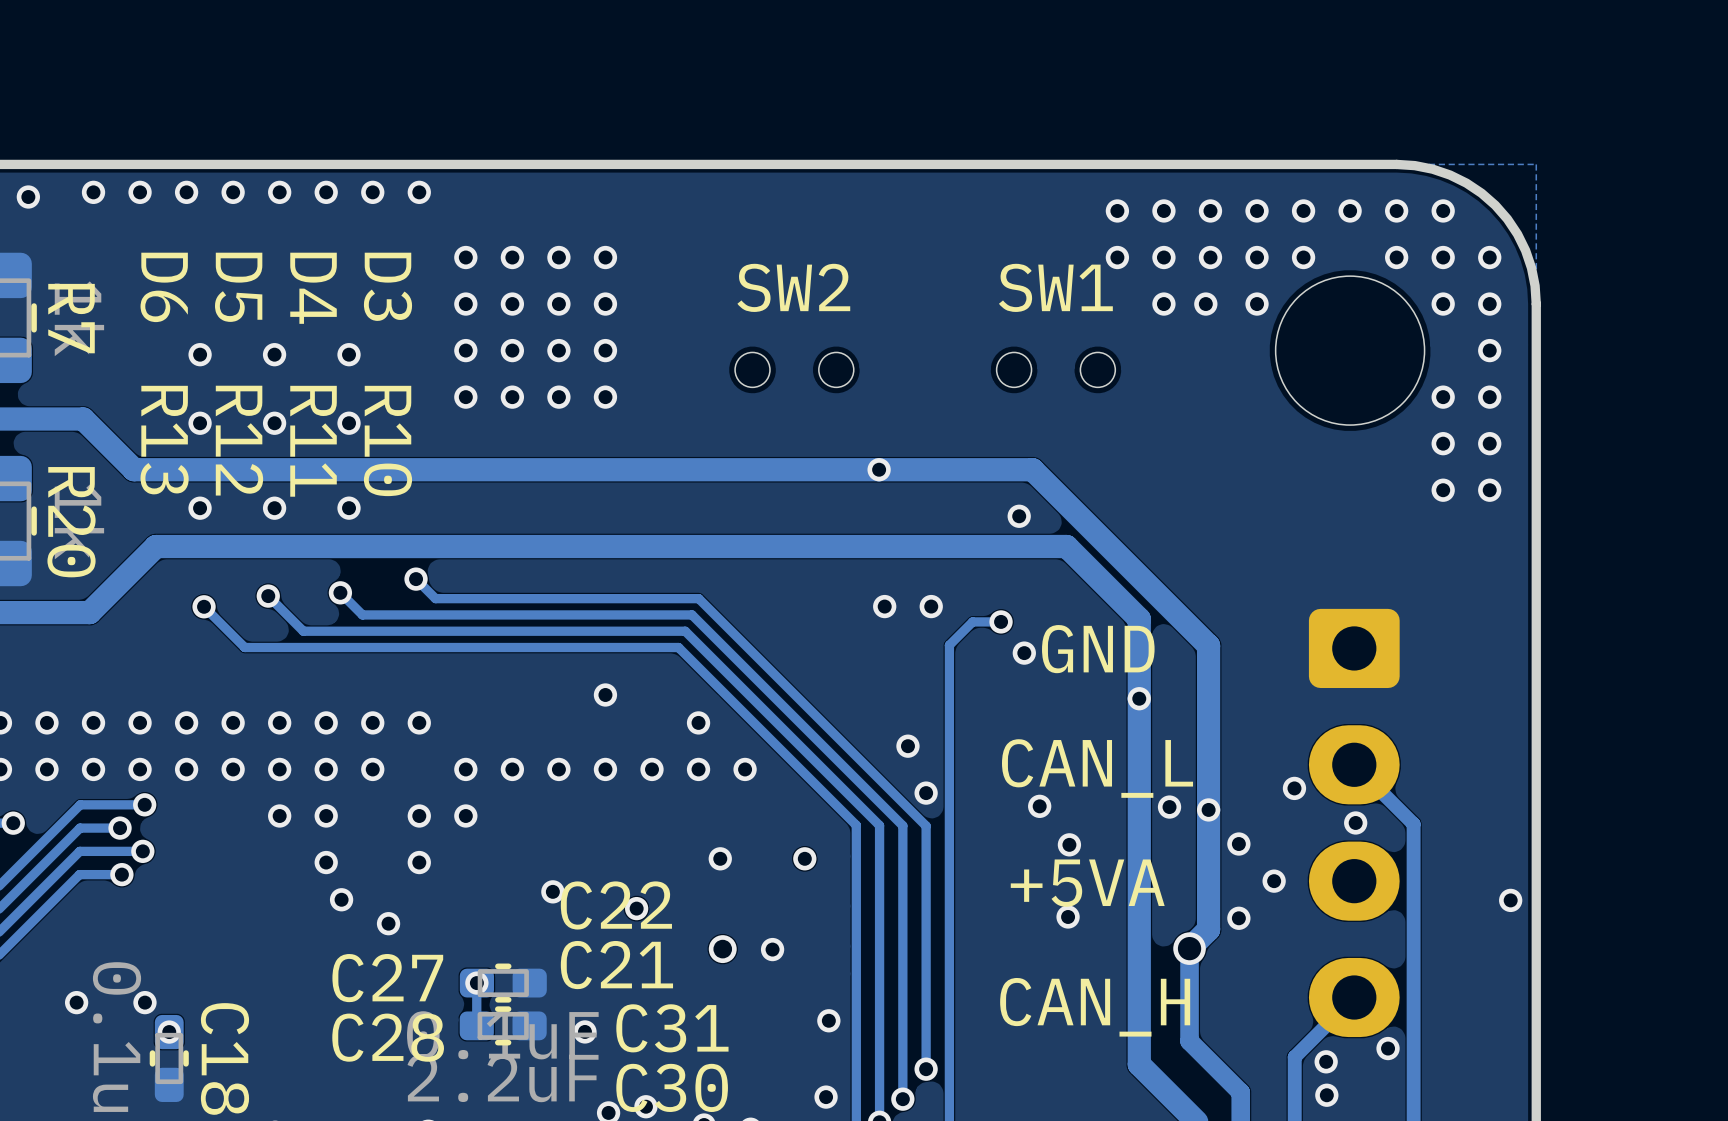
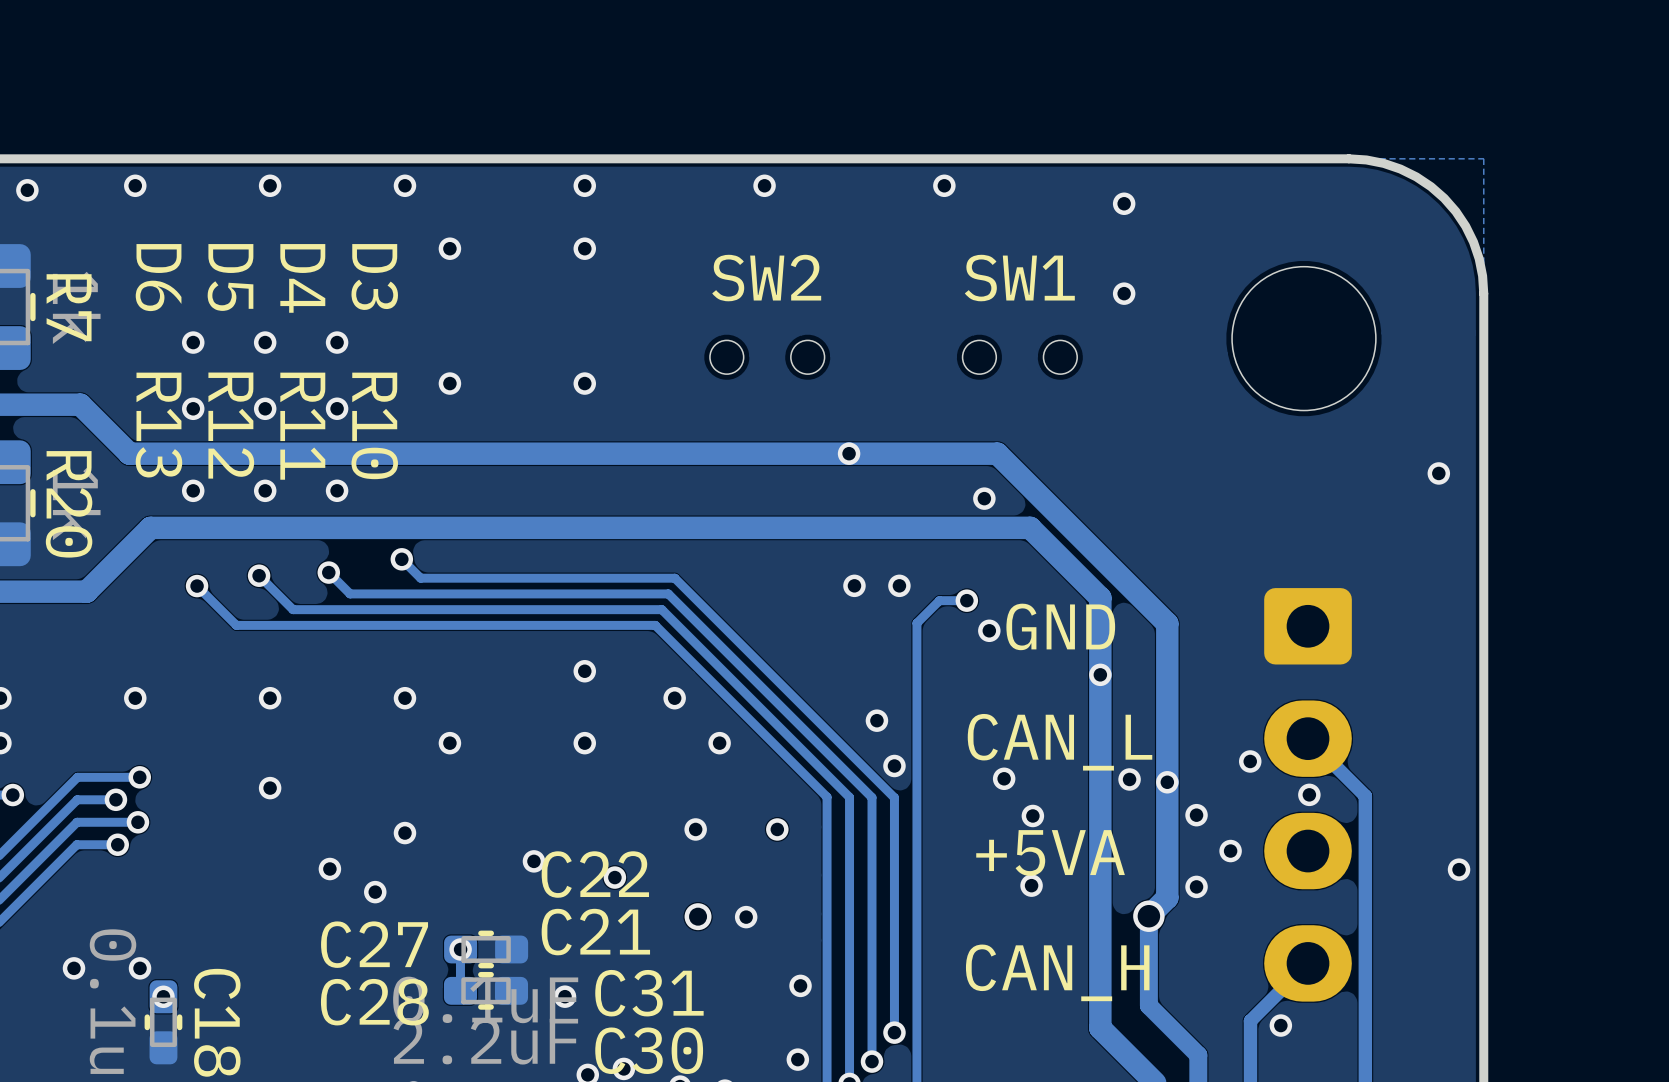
via: (93, 192) -> none
via: (186, 192) -> none
via: (233, 192) -> none
via: (326, 192) -> none
via: (372, 192) -> none
via: none -> (584, 185)
via: none -> (764, 185)
via: none -> (944, 185)
via: (1117, 210) -> none
via: (1210, 210) -> none
via: (1257, 210) -> none
via: (1303, 210) -> none
via: (1350, 210) -> none
via: (1396, 210) -> none
via: (1443, 210) -> none
via: (512, 257) -> none
via: (558, 257) -> none
via: (1117, 257) -> none
via: (1163, 257) -> none
via: (1210, 257) -> none
via: (1257, 257) -> none
via: (1303, 257) -> none
via: (1396, 257) -> none
via: (1443, 257) -> none
via: (1489, 257) -> none
via: (465, 304) -> none
via: (512, 304) -> none
via: (558, 304) -> none
via: (605, 304) -> none
via: (1205, 304) -> none
via: (1257, 304) -> none
via: (1443, 304) -> none
via: (1489, 304) -> none
via: (465, 350) -> none
via: (512, 350) -> none
via: (558, 350) -> none
via: (605, 350) -> none
via: (1489, 350) -> none
via: (512, 397) -> none
via: (558, 397) -> none
via: (1443, 397) -> none
via: (1489, 397) -> none
via: (1443, 443) -> none
via: (1489, 443) -> none
via: (1443, 490) -> none
via: (46, 722) -> none
via: (93, 722) -> none
via: (186, 722) -> none
via: (233, 722) -> none
via: (326, 722) -> none
via: (372, 722) -> none
via: (46, 769) -> none
via: (93, 769) -> none
via: (140, 769) -> none
via: (186, 769) -> none
via: (233, 769) -> none
via: (279, 769) -> none
via: (326, 769) -> none
via: (372, 769) -> none
via: (512, 769) -> none
via: (558, 769) -> none
via: (652, 769) -> none
via: (698, 769) -> none
via: (326, 815) -> none
via: (419, 815) -> none
via: (465, 815) -> none
via: (326, 862) -> none
via: (1388, 1048) -> none
via: (1326, 1095) -> none

